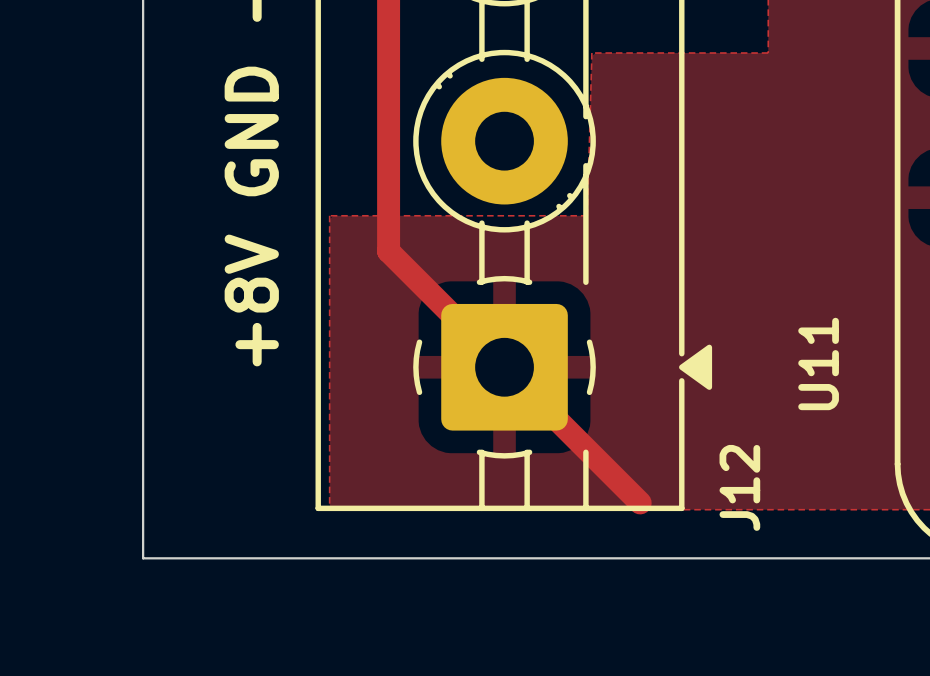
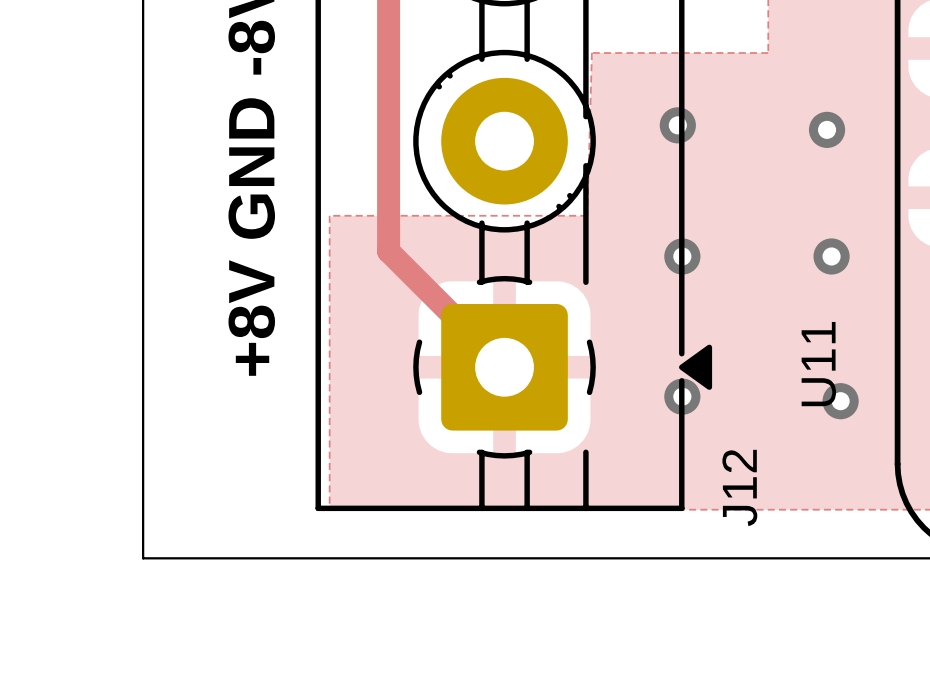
via: none -> (677, 125)
via: none -> (827, 129)
via: none -> (682, 256)
via: none -> (831, 256)
track: (504, 367) (640, 502) -> none
via: none -> (682, 396)
via: none -> (840, 401)

